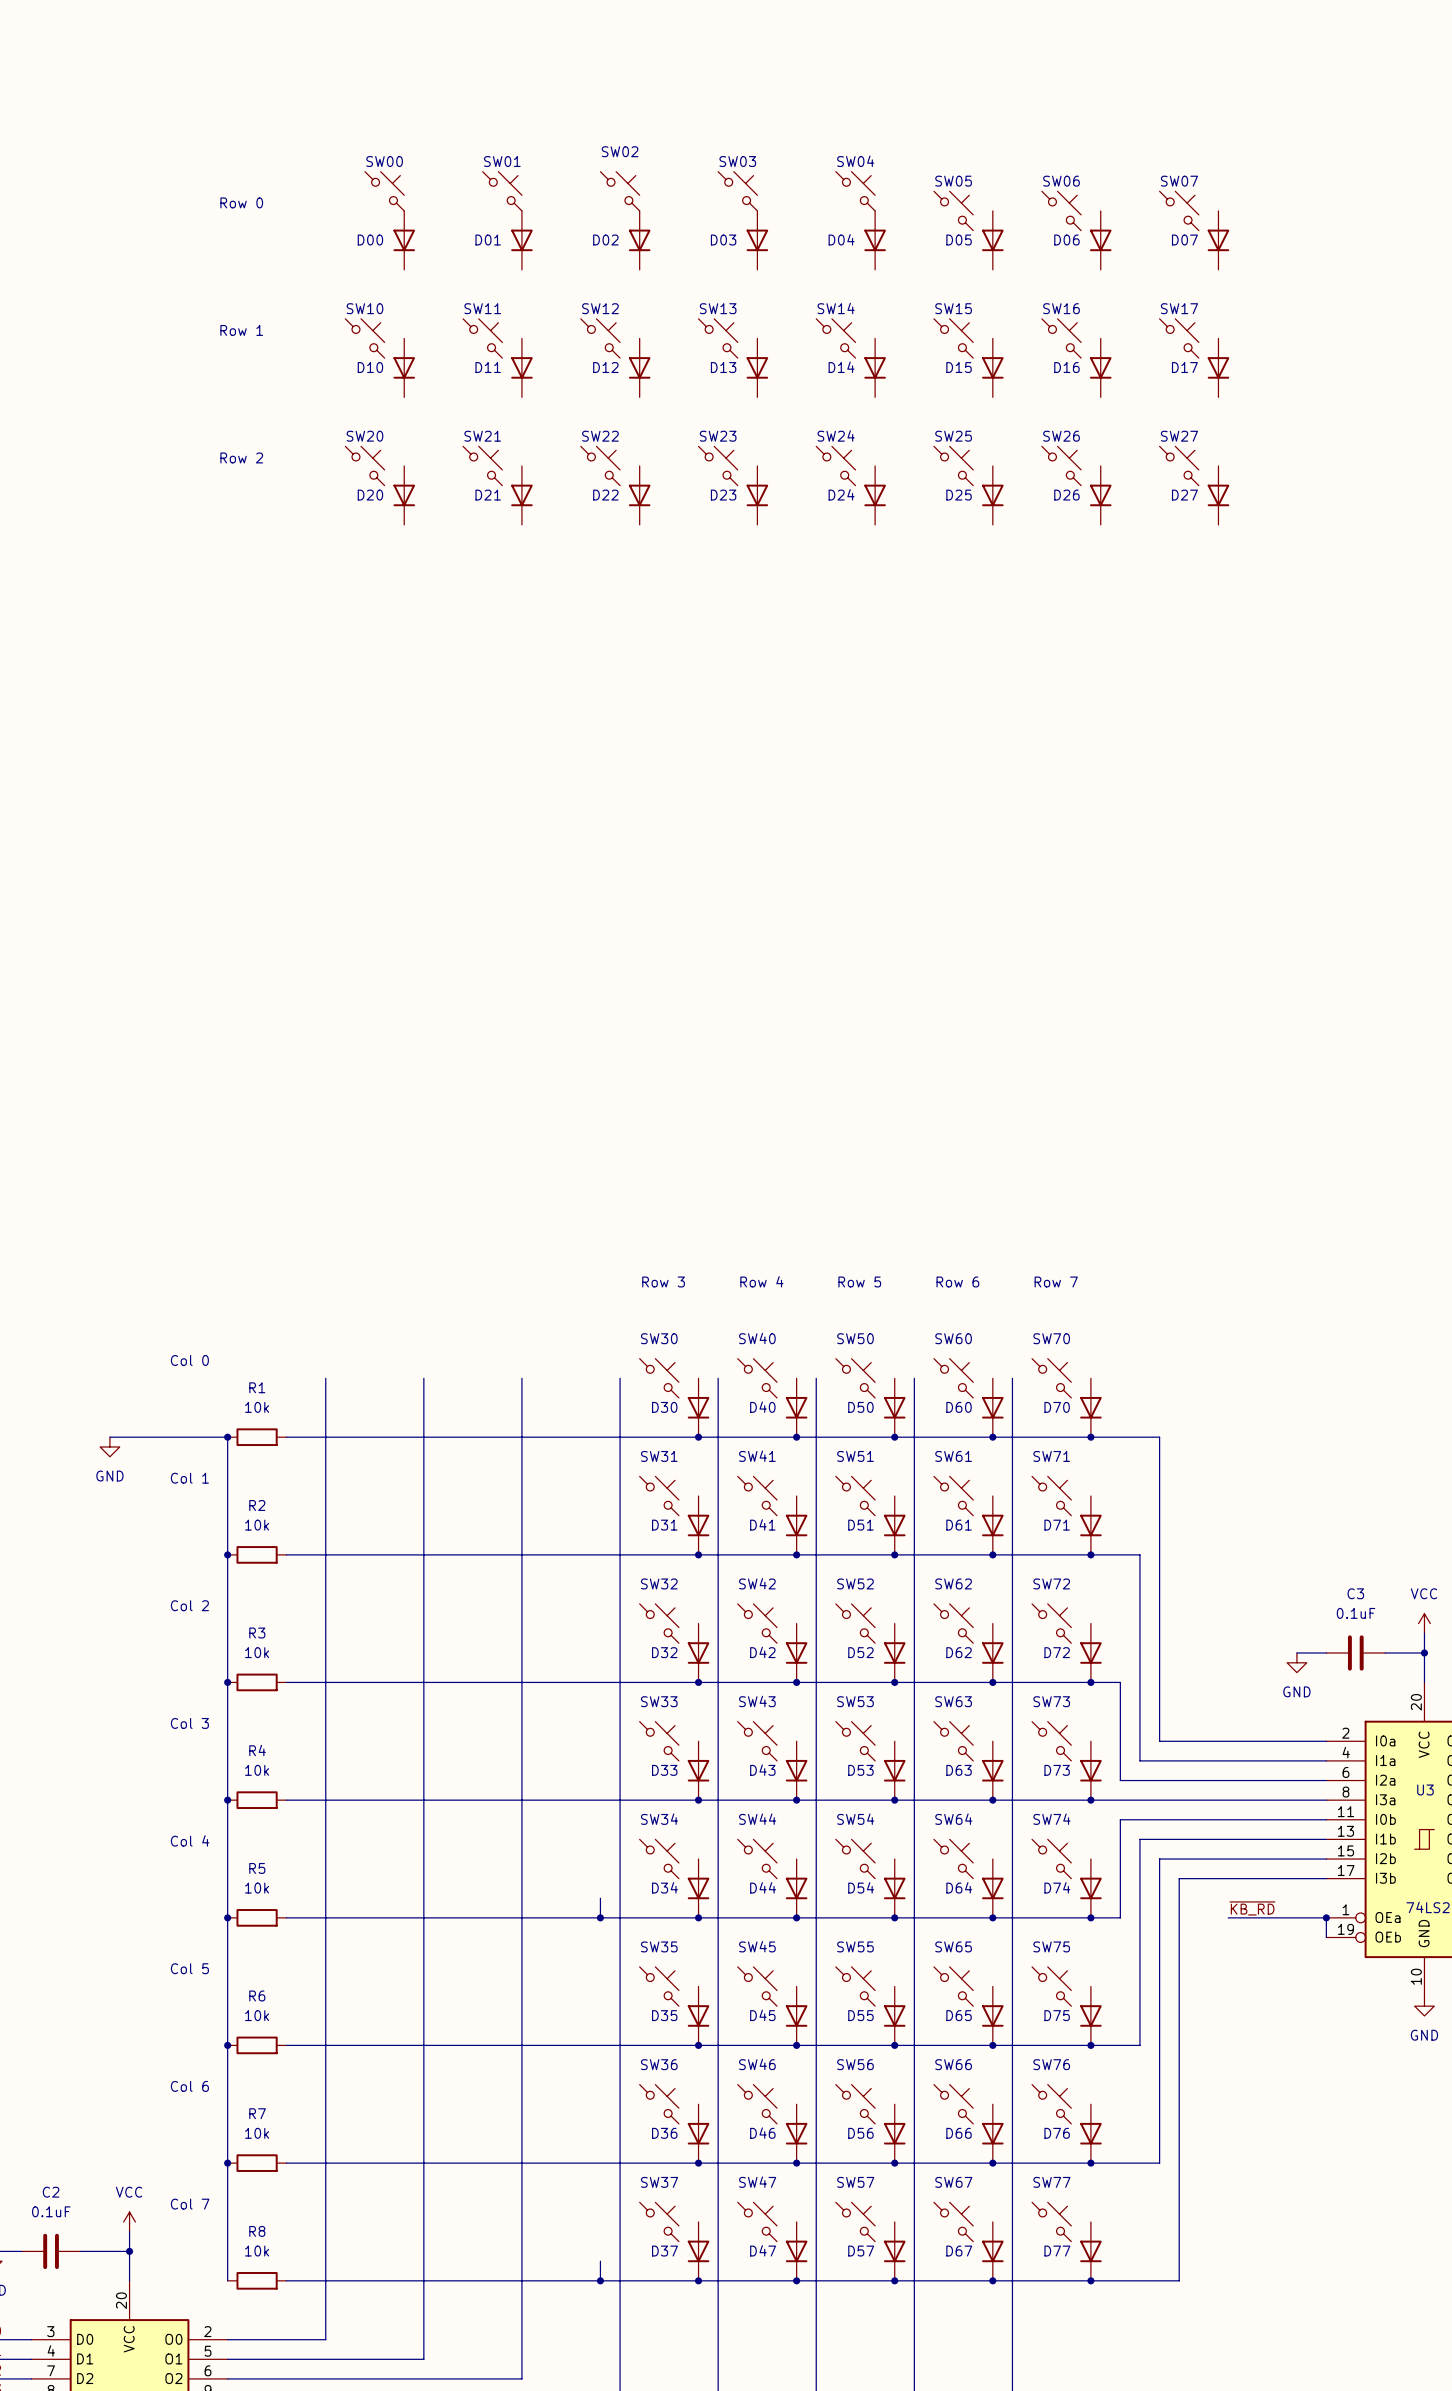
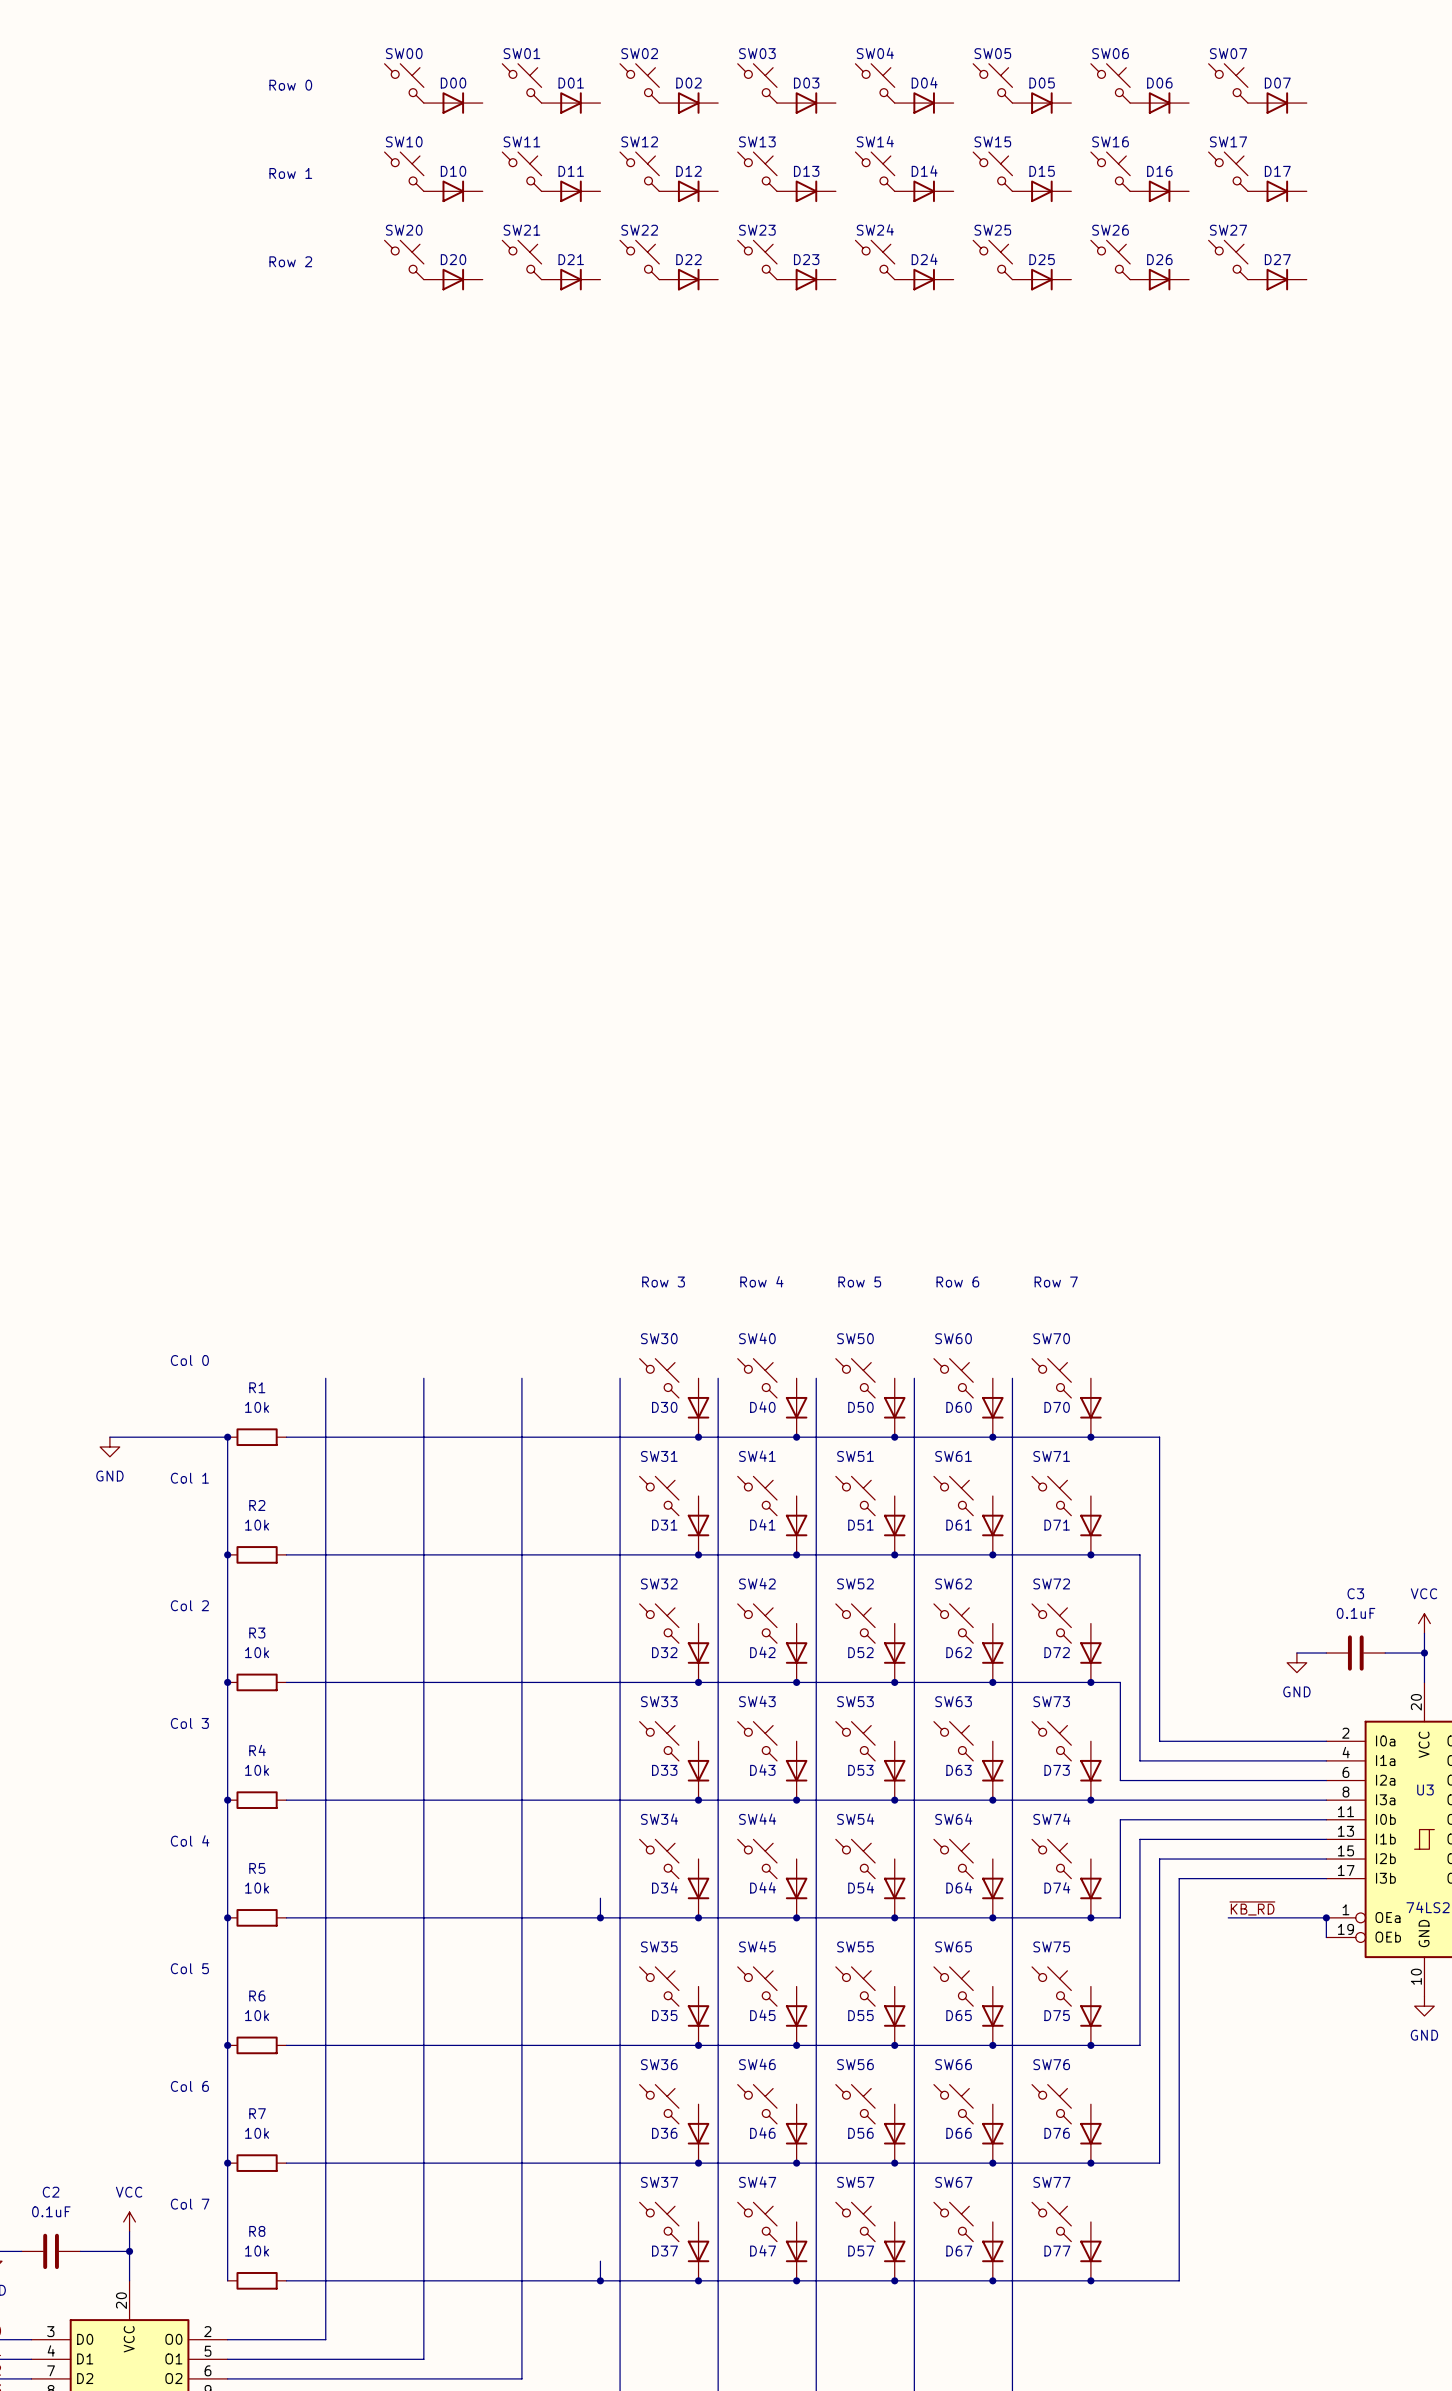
SW02 name position: SW02 (620, 151) -> SW02 (639, 53)
SW00 position: (384, 191) -> (404, 83)
SW01 position: (502, 191) -> (521, 83)
SW02 position: (620, 191) -> (639, 83)
SW03 position: (737, 191) -> (757, 83)
SW04 position: (855, 191) -> (875, 83)
text position: Row 0 (241, 202) -> Row 0 (290, 85)
SW05 position: (953, 210) -> (992, 83)
SW06 position: (1061, 210) -> (1110, 83)
SW07 position: (1179, 210) -> (1228, 83)
D04 name position: D04 (841, 239) -> D04 (924, 82)
D00 name position: D00 (370, 240) -> D00 (453, 83)
D00 rotation: 0° (404, 240) -> 90° counterclockwise (453, 103)
D00 position: (404, 240) -> (453, 103)
D01 name position: D01 (488, 240) -> D01 (571, 83)
D01 rotation: 0° (521, 240) -> 90° counterclockwise (571, 103)
D01 position: (521, 240) -> (571, 103)
D02 name position: D02 (605, 240) -> D02 (688, 83)
D02 rotation: 0° (639, 240) -> 90° counterclockwise (688, 103)
D02 position: (639, 240) -> (688, 103)
D03 name position: D03 (723, 240) -> D03 (806, 83)
D03 rotation: 0° (757, 240) -> 90° counterclockwise (806, 103)
D03 position: (757, 240) -> (806, 103)
D04 rotation: 0° (875, 240) -> 90° counterclockwise (924, 103)
D04 position: (875, 240) -> (924, 103)
D05 name position: D05 (959, 240) -> D05 (1042, 83)
D05 rotation: 0° (992, 240) -> 90° counterclockwise (1041, 103)
D05 position: (992, 240) -> (1041, 103)
D06 name position: D06 (1066, 240) -> D06 (1159, 83)
D06 rotation: 0° (1100, 240) -> 90° counterclockwise (1159, 103)
D06 position: (1100, 240) -> (1159, 103)
D07 name position: D07 (1184, 240) -> D07 (1277, 83)
D07 rotation: 0° (1218, 240) -> 90° counterclockwise (1277, 103)
D07 position: (1218, 240) -> (1277, 103)
text: none -> Row 2 (290, 261)
text position: Row 1 (241, 330) -> Row 1 (290, 173)
SW10 position: (364, 338) -> (404, 171)
SW11 position: (482, 338) -> (521, 171)
SW12 position: (600, 338) -> (639, 171)
SW13 position: (718, 338) -> (757, 171)
SW14 position: (835, 338) -> (875, 171)
SW15 position: (953, 338) -> (992, 171)
SW16 position: (1061, 338) -> (1110, 171)
SW17 position: (1179, 338) -> (1228, 171)
D10 name position: D10 (370, 367) -> D10 (453, 171)
D10 rotation: 0° (404, 367) -> 90° counterclockwise (453, 191)
D10 position: (404, 367) -> (453, 191)
D11 name position: D11 (488, 367) -> D11 (571, 171)
D11 rotation: 0° (521, 367) -> 90° counterclockwise (571, 191)
D11 position: (521, 367) -> (571, 191)
D12 name position: D12 (605, 367) -> D12 (688, 171)
D12 rotation: 0° (639, 367) -> 90° counterclockwise (688, 191)
D12 position: (639, 367) -> (688, 191)
D13 name position: D13 (723, 367) -> D13 (806, 171)
D13 rotation: 0° (757, 367) -> 90° counterclockwise (806, 191)
D13 position: (757, 367) -> (806, 191)
D14 name position: D14 (841, 367) -> D14 (924, 171)
D14 rotation: 0° (875, 367) -> 90° counterclockwise (924, 191)
D14 position: (875, 367) -> (924, 191)
D15 name position: D15 (959, 367) -> D15 (1042, 171)
D15 rotation: 0° (992, 367) -> 90° counterclockwise (1041, 191)
D15 position: (992, 367) -> (1041, 191)
D16 name position: D16 (1066, 367) -> D16 (1159, 171)
D16 rotation: 0° (1100, 367) -> 90° counterclockwise (1159, 191)
D16 position: (1100, 367) -> (1159, 191)
D17 name position: D17 (1184, 367) -> D17 (1277, 171)
D17 rotation: 0° (1218, 367) -> 90° counterclockwise (1277, 191)
D17 position: (1218, 367) -> (1277, 191)
text: Row 2 (241, 457) -> none
SW20 position: (364, 466) -> (404, 259)
SW21 position: (482, 466) -> (521, 259)
SW22 position: (600, 466) -> (639, 259)
SW23 position: (718, 466) -> (757, 259)
SW24 position: (835, 466) -> (875, 259)
SW25 position: (953, 466) -> (992, 259)
SW26 position: (1061, 466) -> (1110, 259)
SW27 position: (1179, 466) -> (1228, 259)
D24 name position: D24 (841, 494) -> D24 (924, 259)
D20 name position: D20 (370, 495) -> D20 (453, 259)
D20 rotation: 0° (404, 495) -> 90° counterclockwise (453, 279)
D20 position: (404, 495) -> (453, 279)
D21 name position: D21 (488, 495) -> D21 (571, 259)
D21 rotation: 0° (521, 495) -> 90° counterclockwise (571, 279)
D21 position: (521, 495) -> (571, 279)
D22 name position: D22 (605, 495) -> D22 (688, 259)
D22 rotation: 0° (639, 495) -> 90° counterclockwise (688, 279)
D22 position: (639, 495) -> (688, 279)
D23 name position: D23 (723, 495) -> D23 (806, 259)
D23 rotation: 0° (757, 495) -> 90° counterclockwise (806, 279)
D23 position: (757, 495) -> (806, 279)
D24 rotation: 0° (875, 495) -> 90° counterclockwise (924, 279)
D24 position: (875, 495) -> (924, 279)
D25 name position: D25 (959, 495) -> D25 (1042, 259)
D25 rotation: 0° (992, 495) -> 90° counterclockwise (1041, 279)
D25 position: (992, 495) -> (1041, 279)
D26 name position: D26 (1066, 495) -> D26 (1159, 259)
D26 rotation: 0° (1100, 495) -> 90° counterclockwise (1159, 279)
D26 position: (1100, 495) -> (1159, 279)
D27 name position: D27 (1184, 495) -> D27 (1277, 259)
D27 rotation: 0° (1218, 495) -> 90° counterclockwise (1277, 279)
D27 position: (1218, 495) -> (1277, 279)

